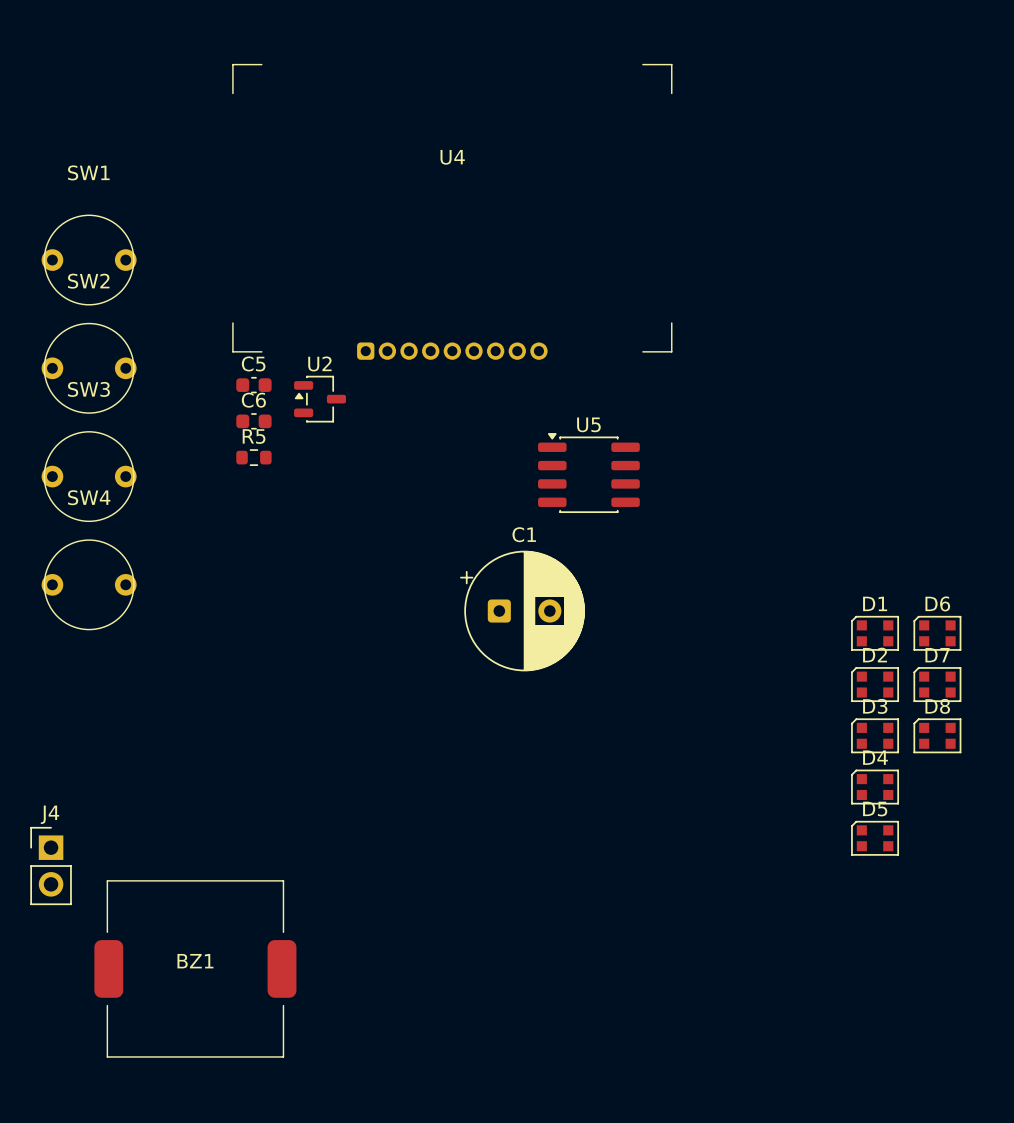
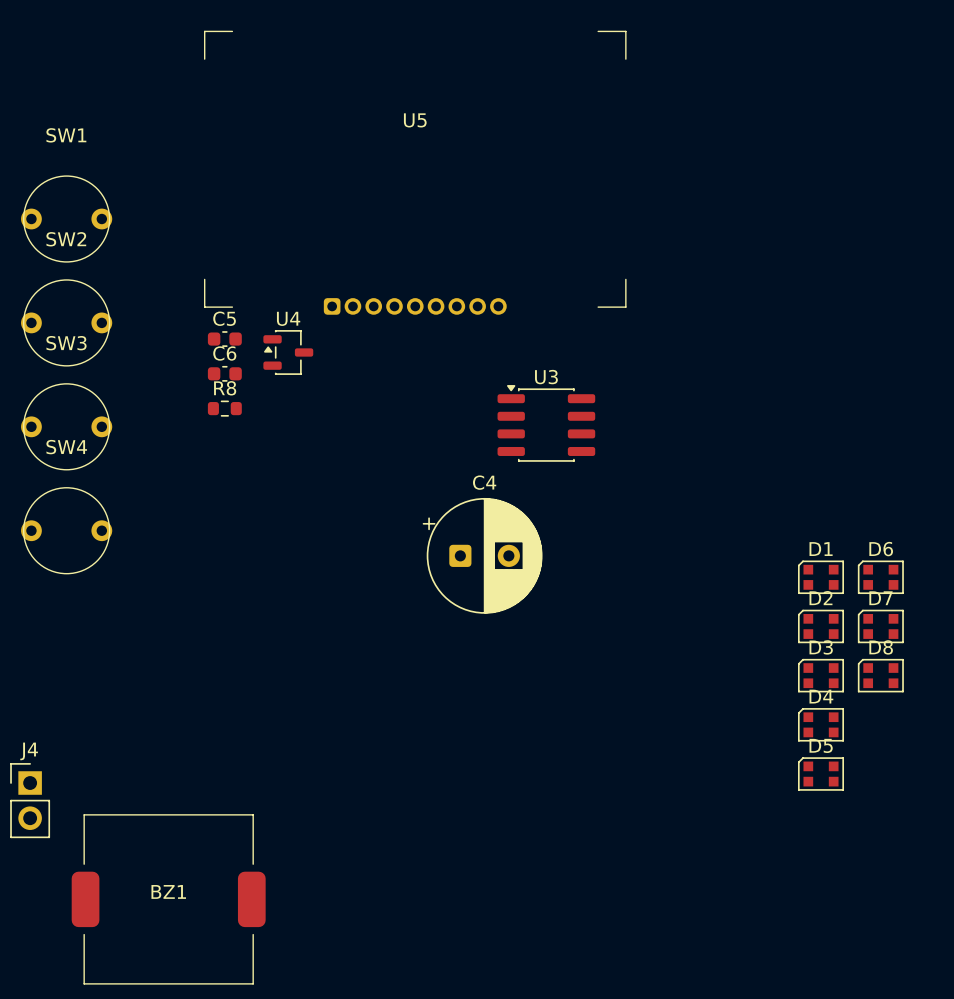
U4 name: U4 (452, 157) -> U5 (415, 120)
U2 name: U2 (319, 363) -> U4 (288, 318)
U5 name: U5 (588, 424) -> U3 (546, 377)
R5 name: R5 (254, 436) -> R8 (225, 388)
C1 name: C1 (524, 534) -> C4 (484, 482)

